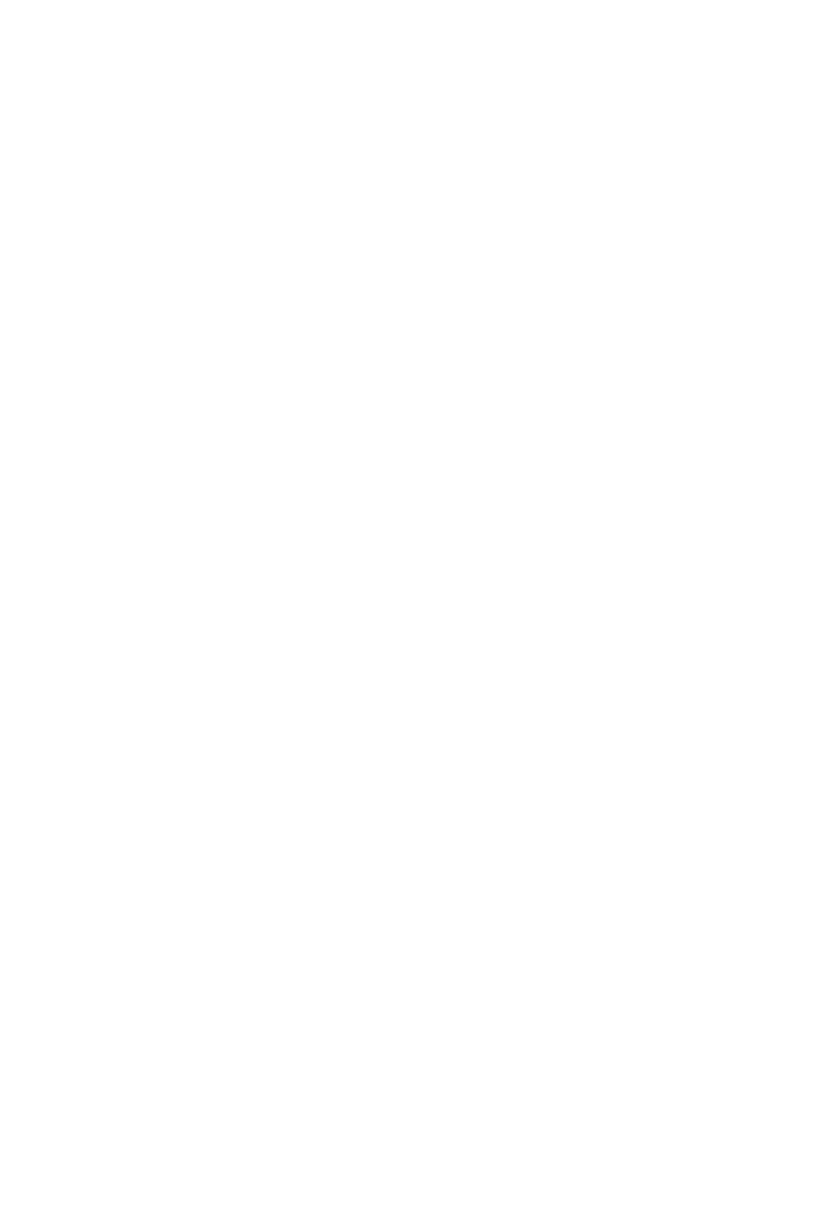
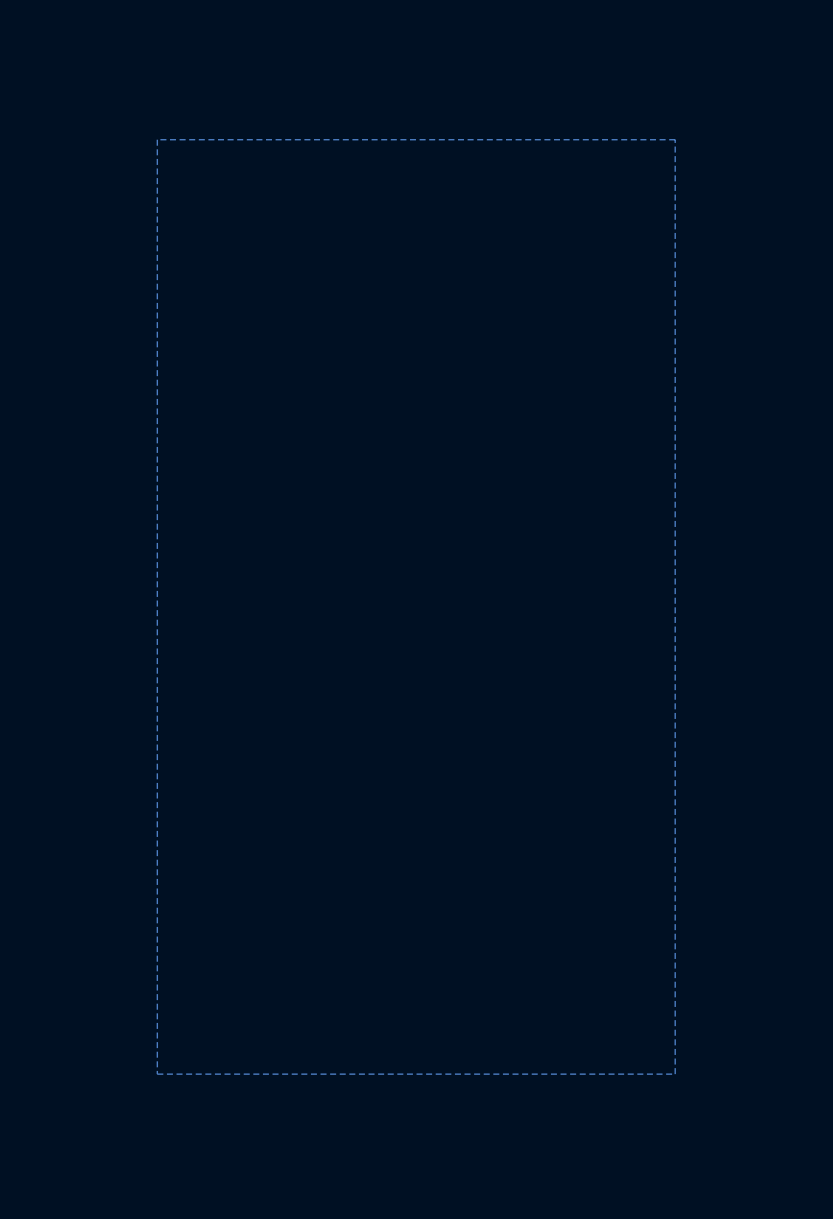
zone outline: none -> (675, 139) (157, 139) (157, 1074) (675, 1074) (675, 139)

